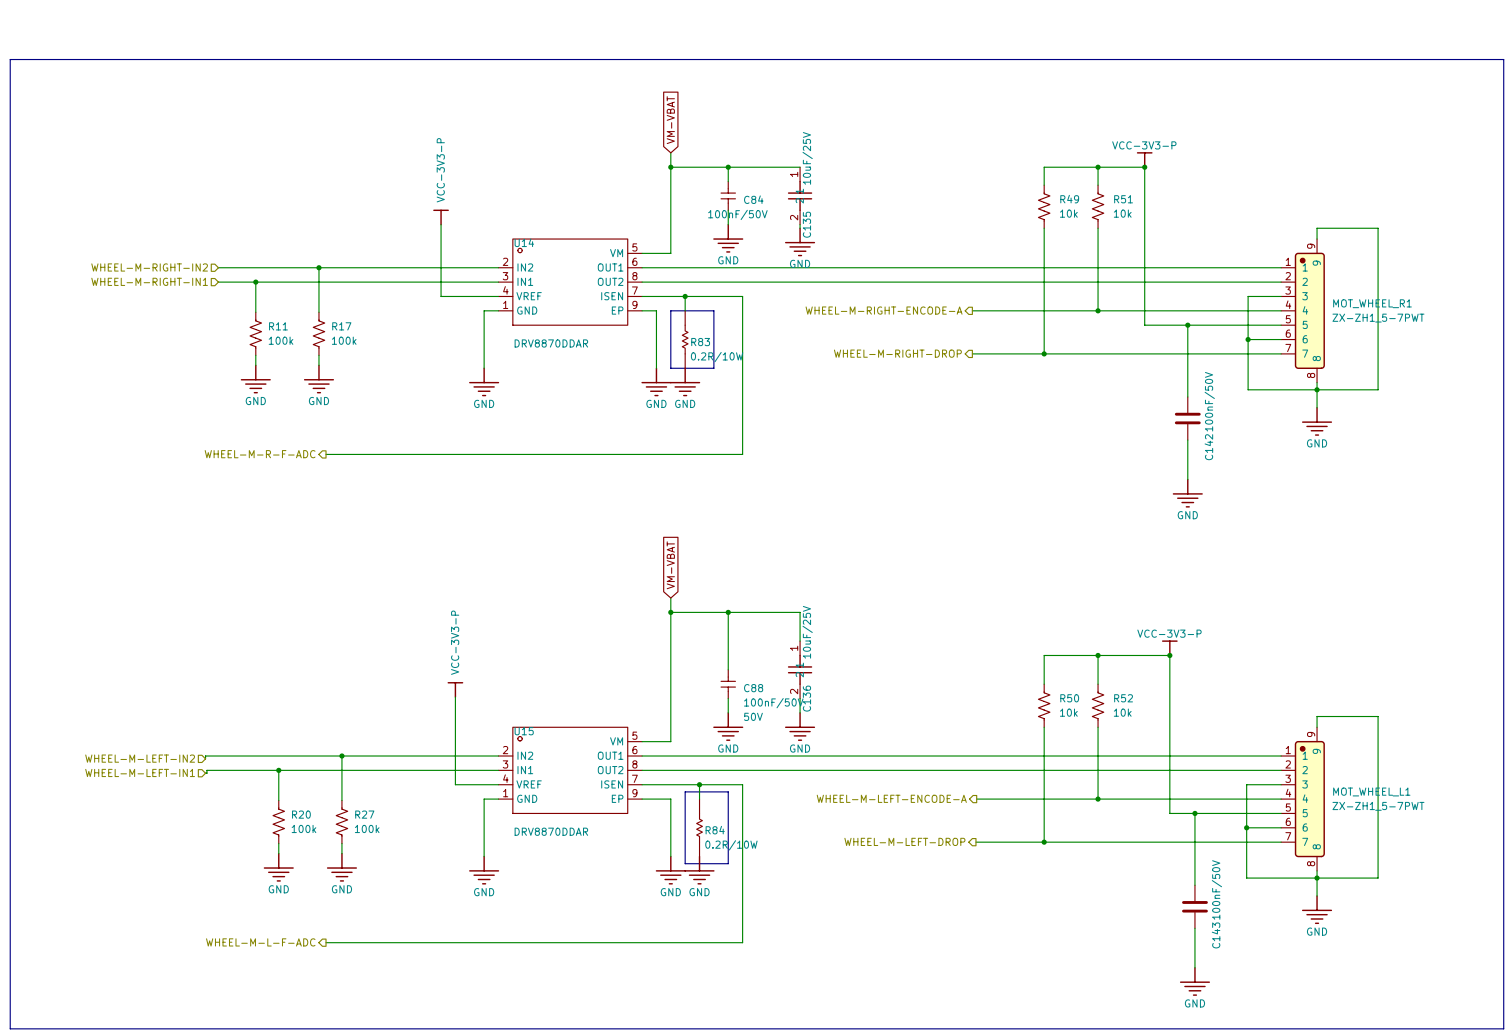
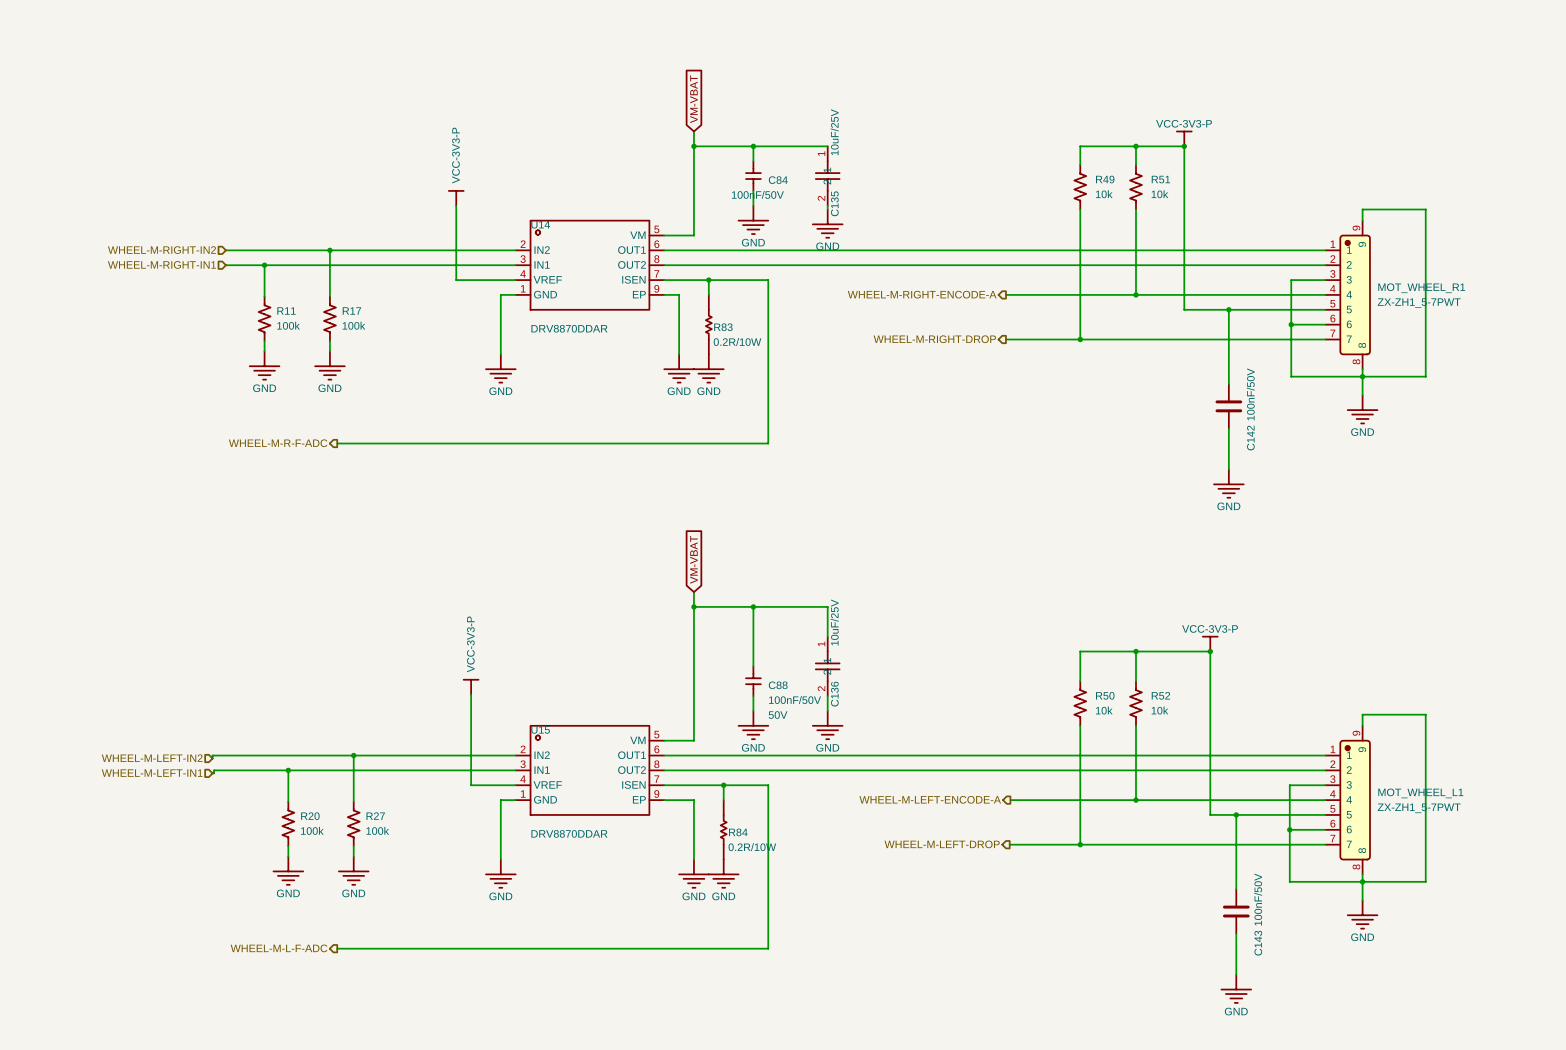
line: (10, 59) (1503, 59) (1503, 1028) (10, 1028) (10, 59) -> none
line: (670, 310) (713, 310) (713, 368) (670, 368) (670, 310) -> none
line: (685, 791) (728, 791) (728, 863) (685, 863) (685, 791) -> none

